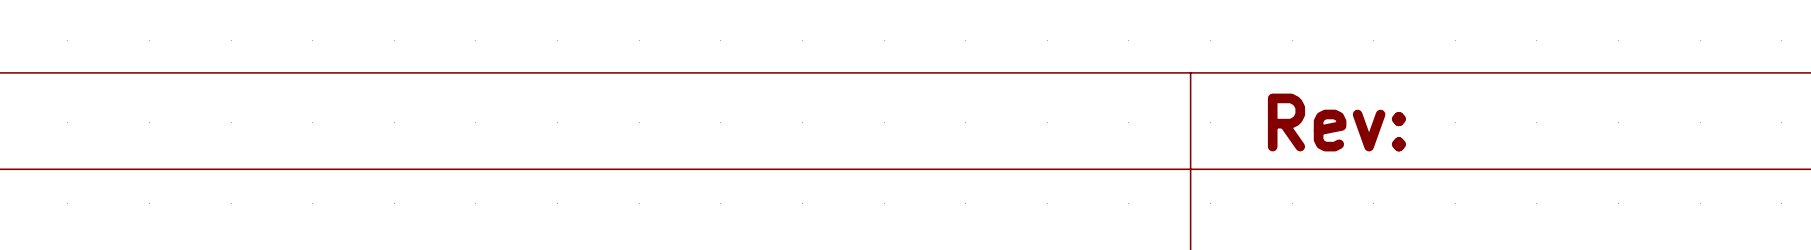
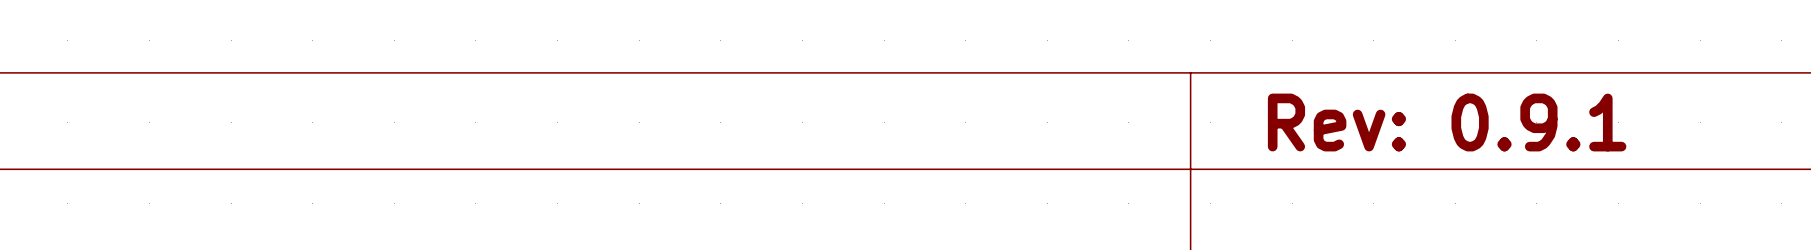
title block: Rev: (1336, 122) -> Rev: 0.9.1 (1447, 122)

